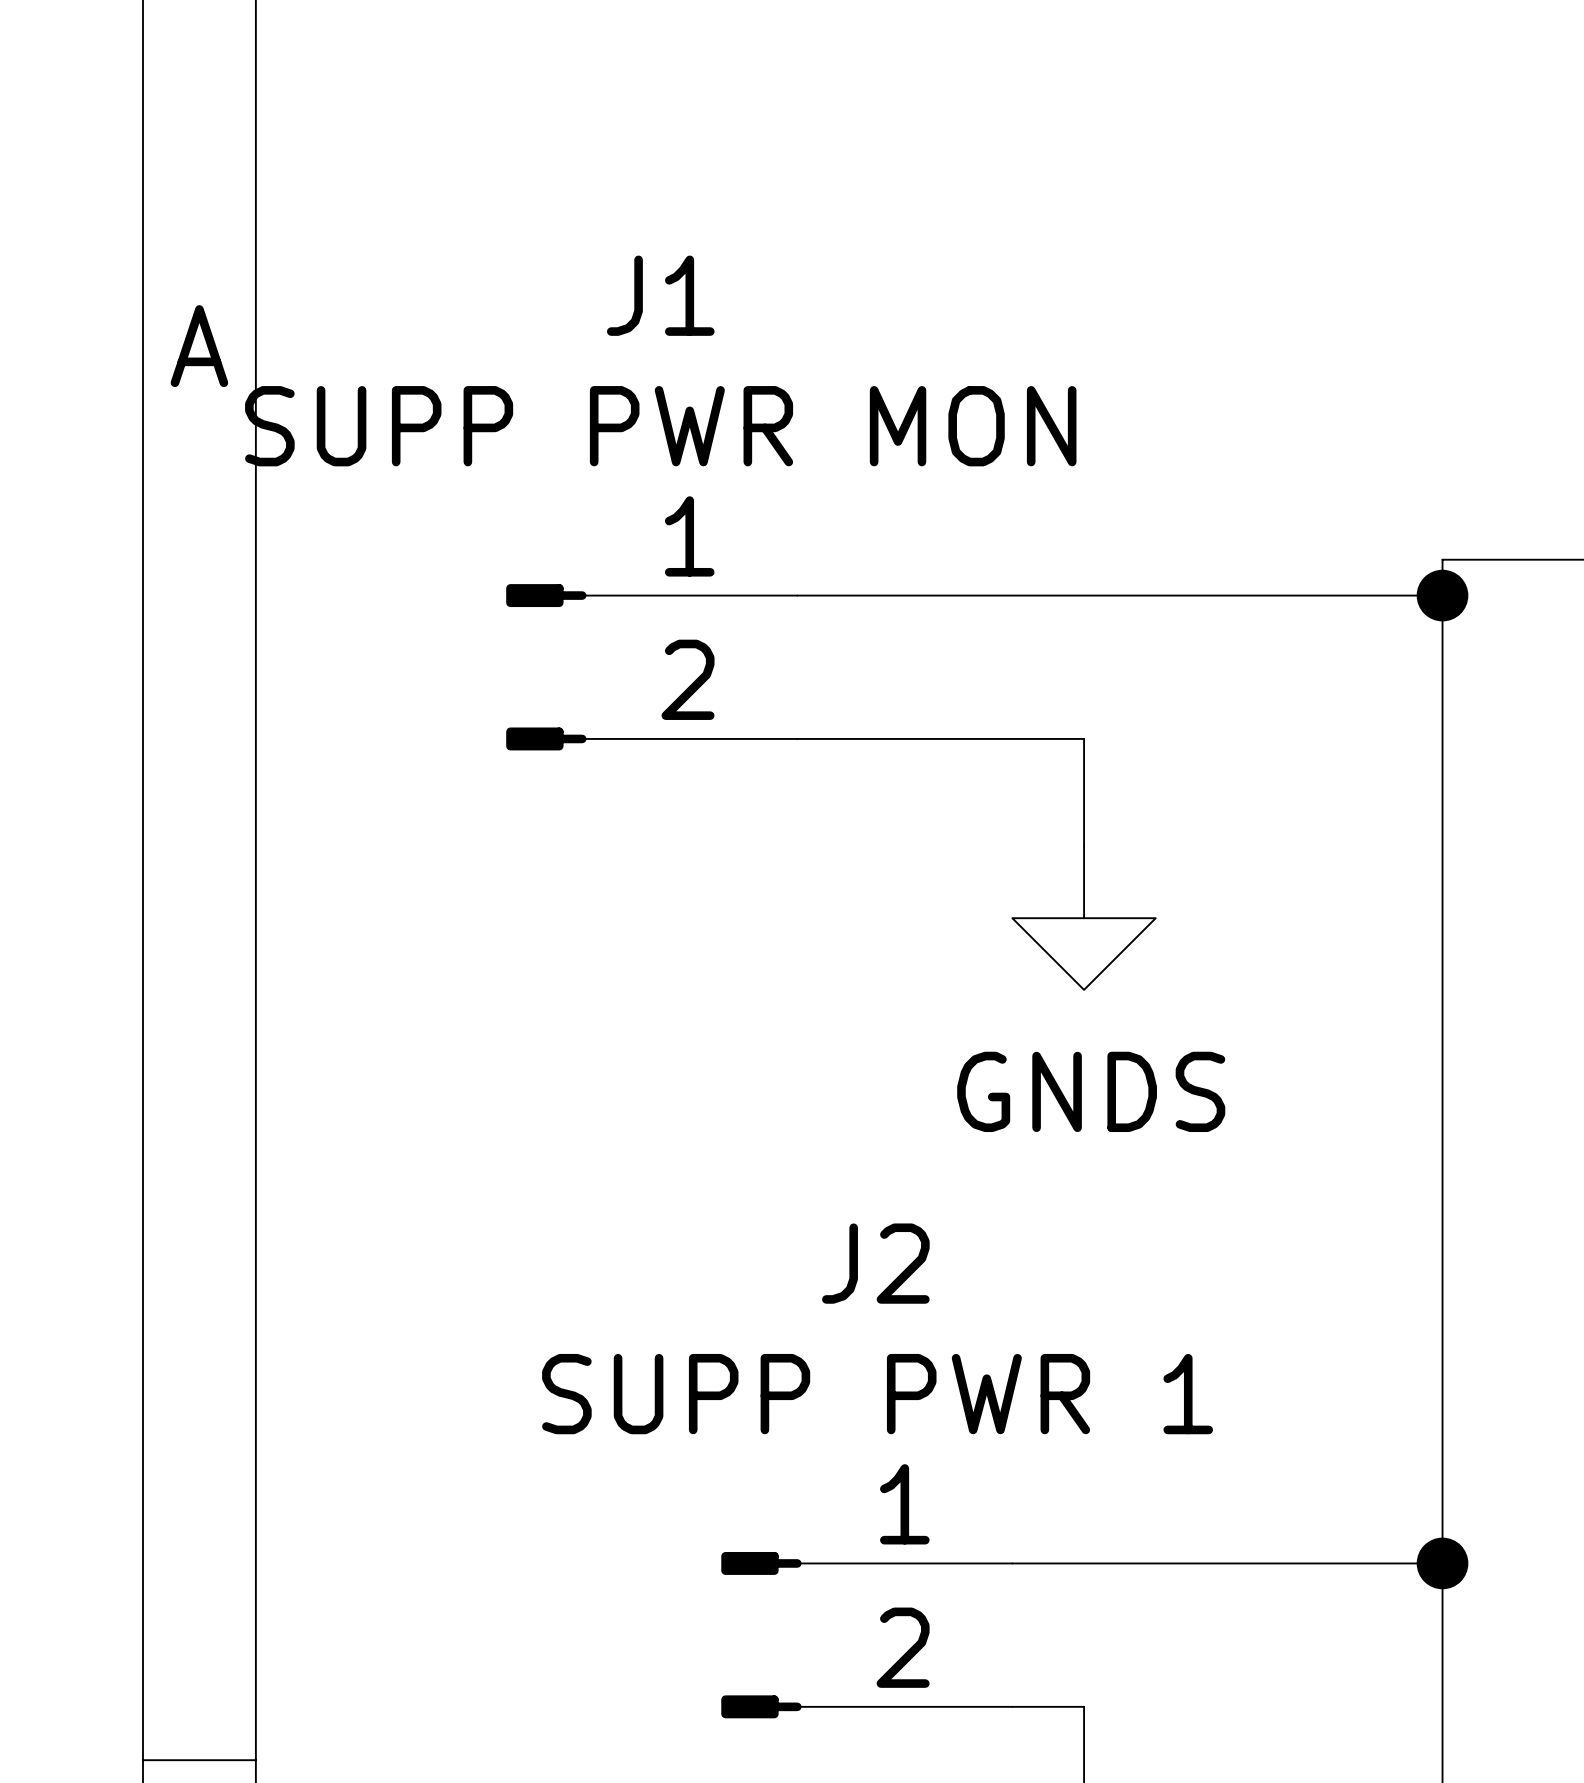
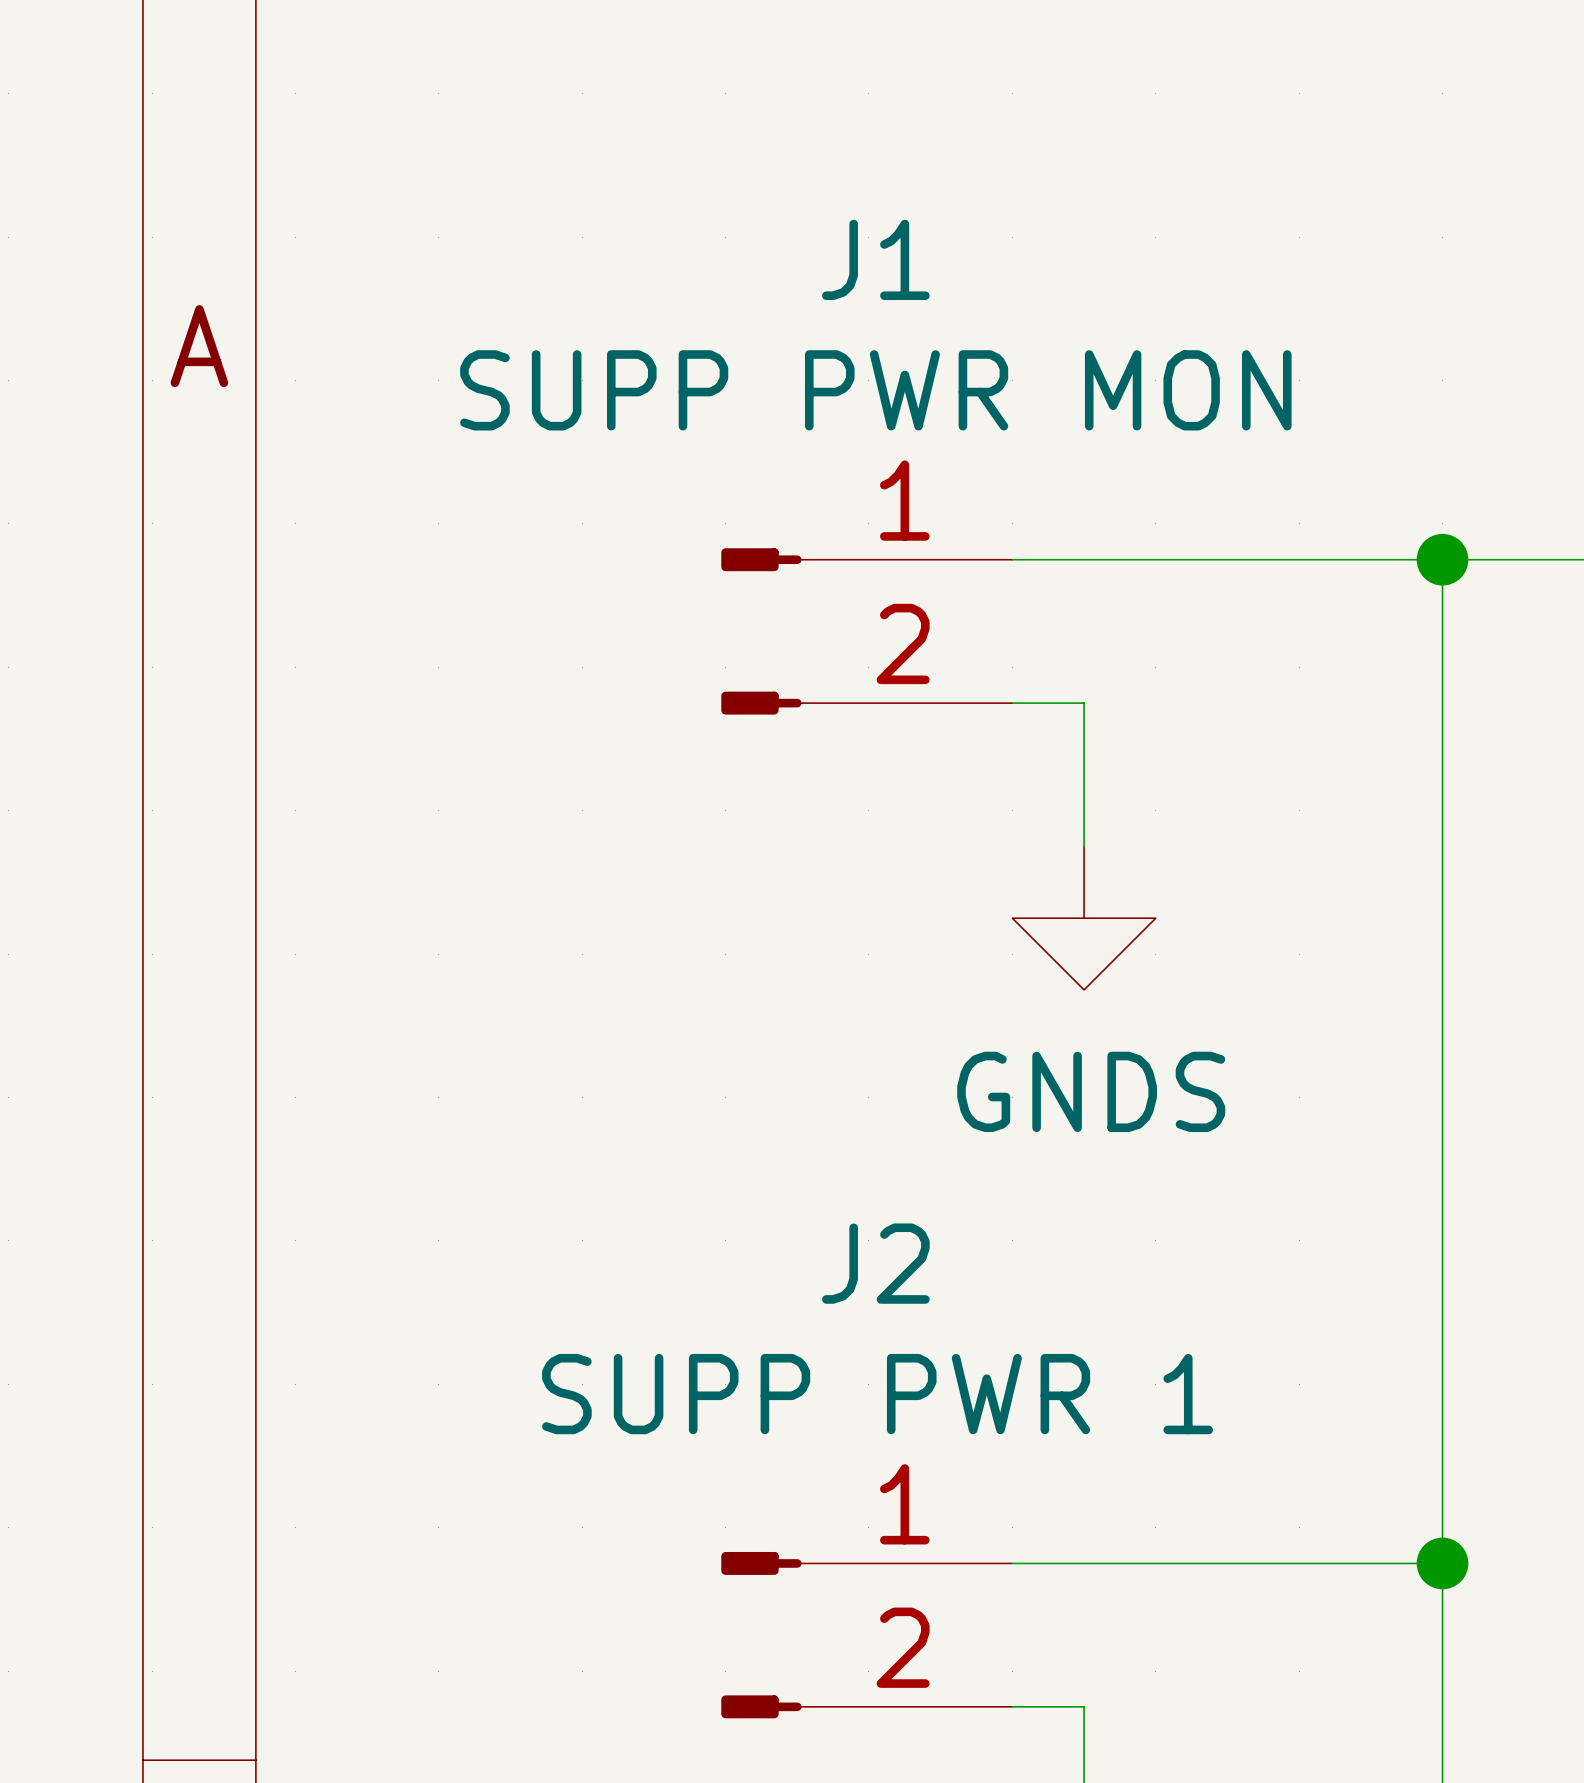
wire: none -> (1012, 559) (1442, 559)
wire: (797, 595) (1442, 595) -> none
junction position: (1442, 595) -> (1442, 559)
J1 position: (651, 667) -> (866, 631)
wire: (797, 738) (1084, 738) -> (1012, 703) (1084, 703) (1084, 738)

